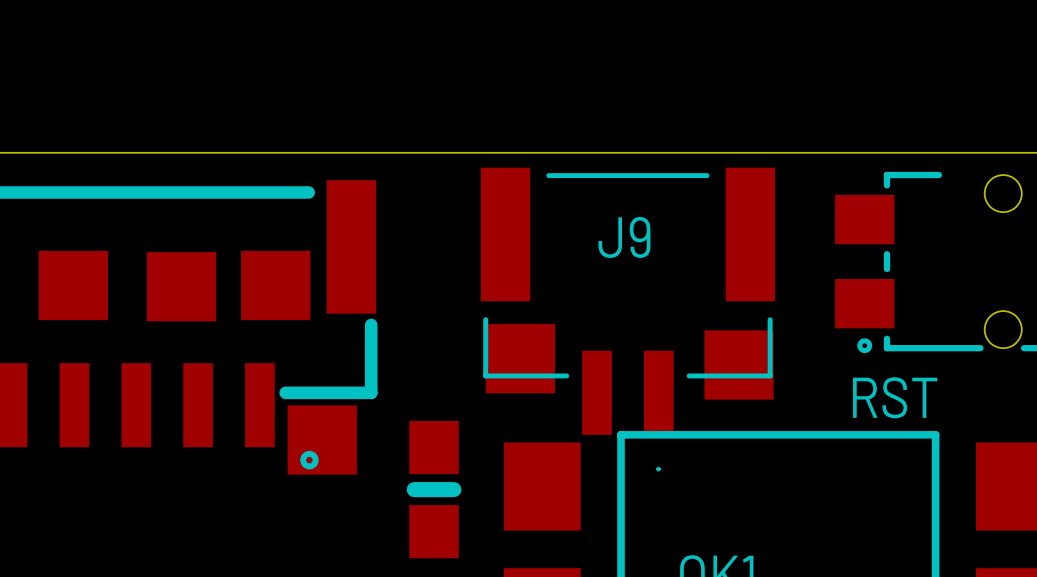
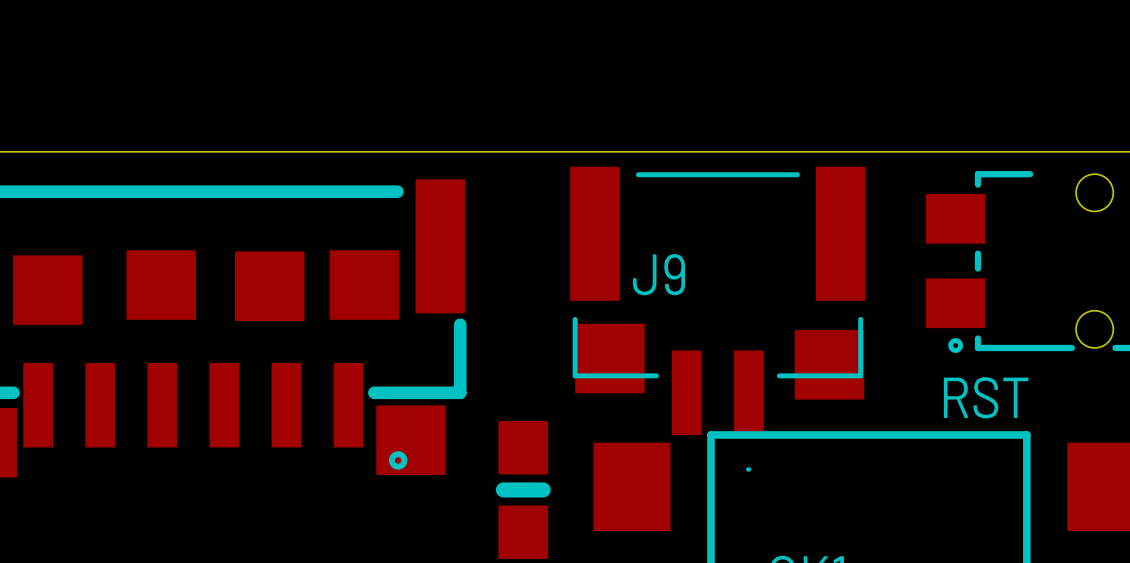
J9 name position: J9 (624, 237) -> J9 (658, 274)

